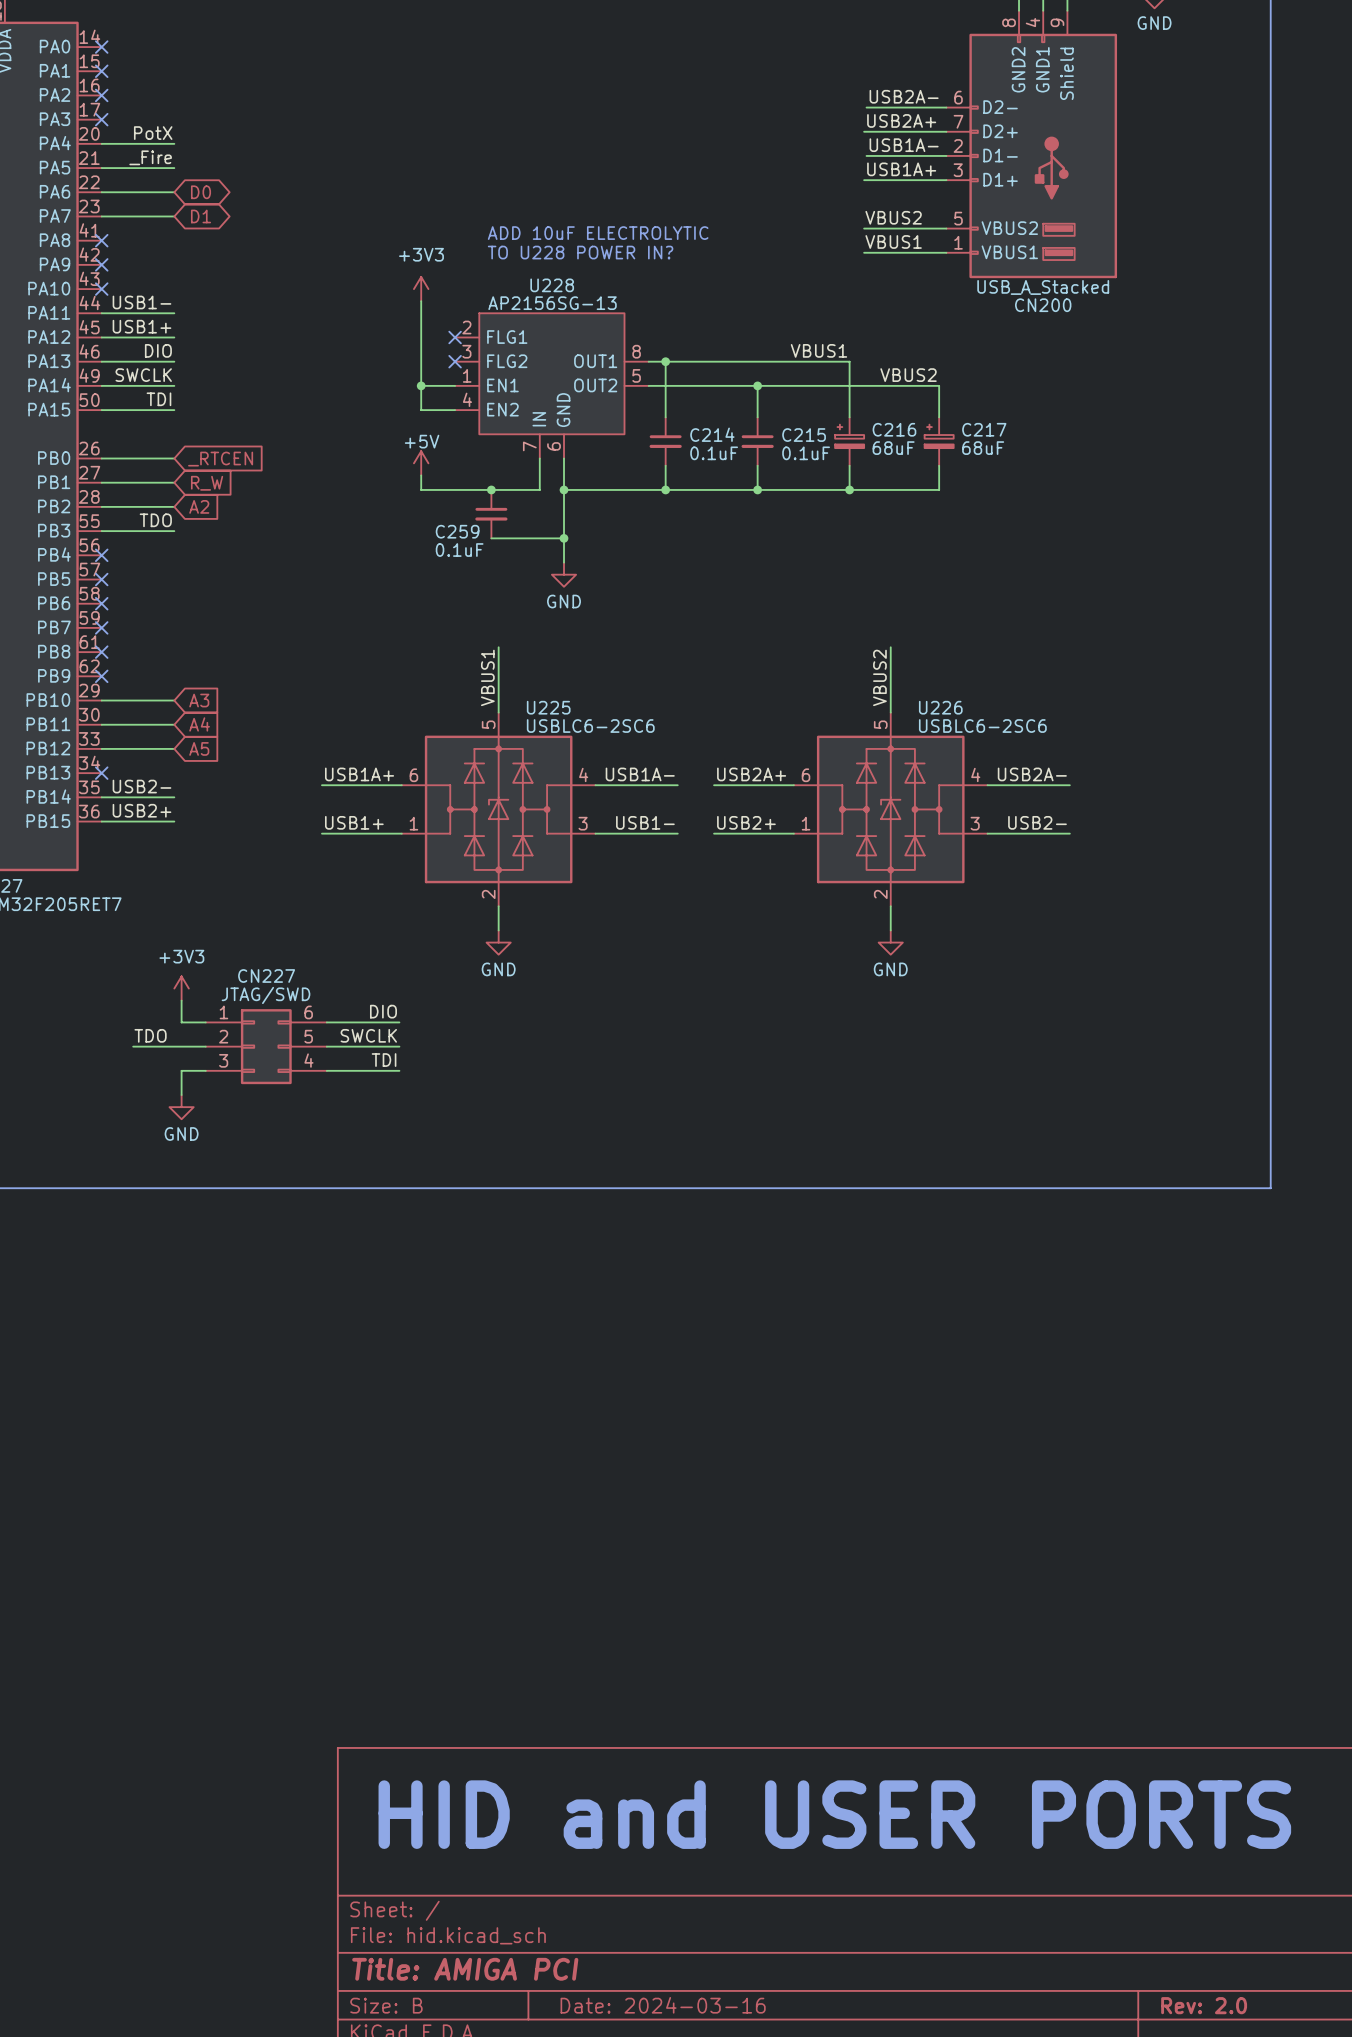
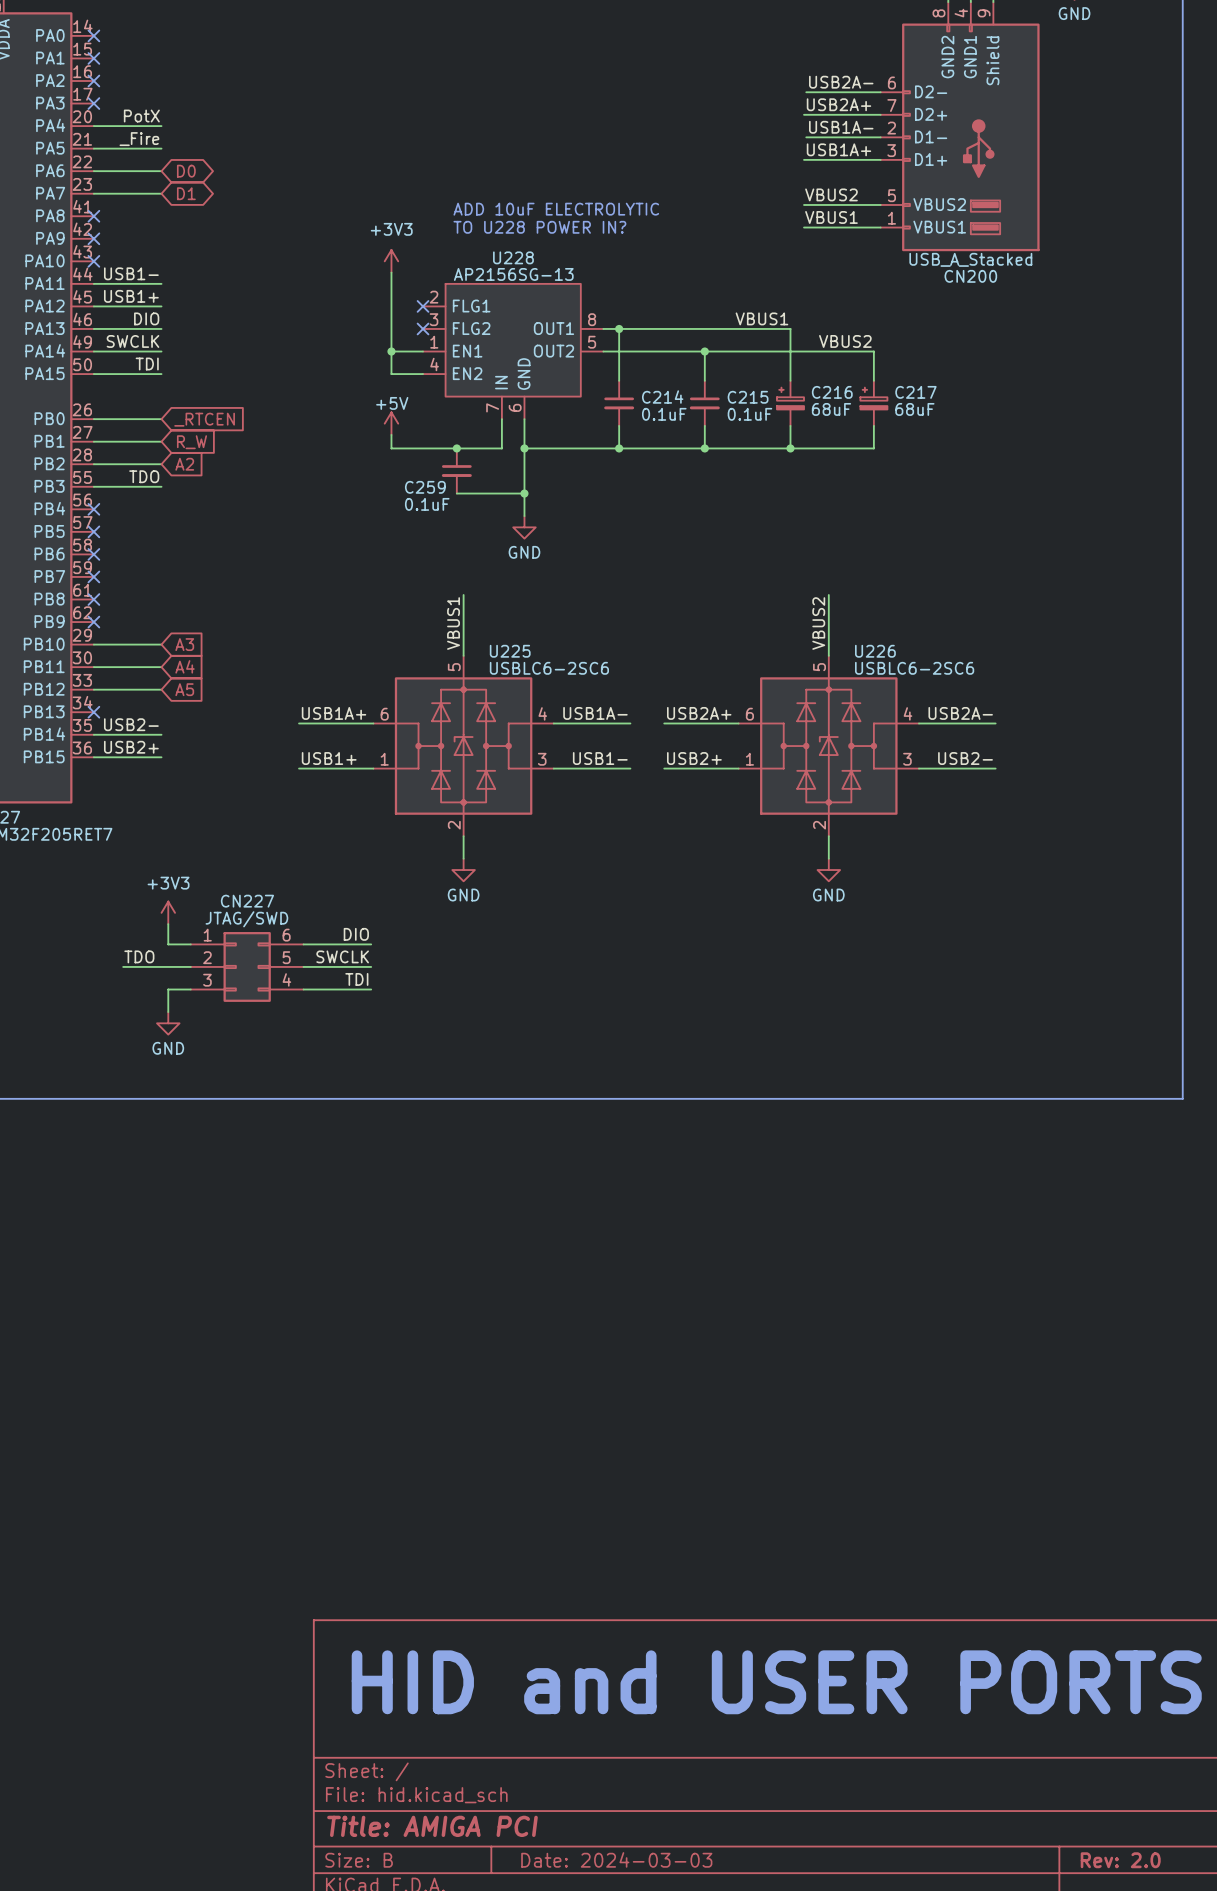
title block: Date: 2024-03-16 (663, 2005) -> Date: 2024-03-03 (616, 1859)

